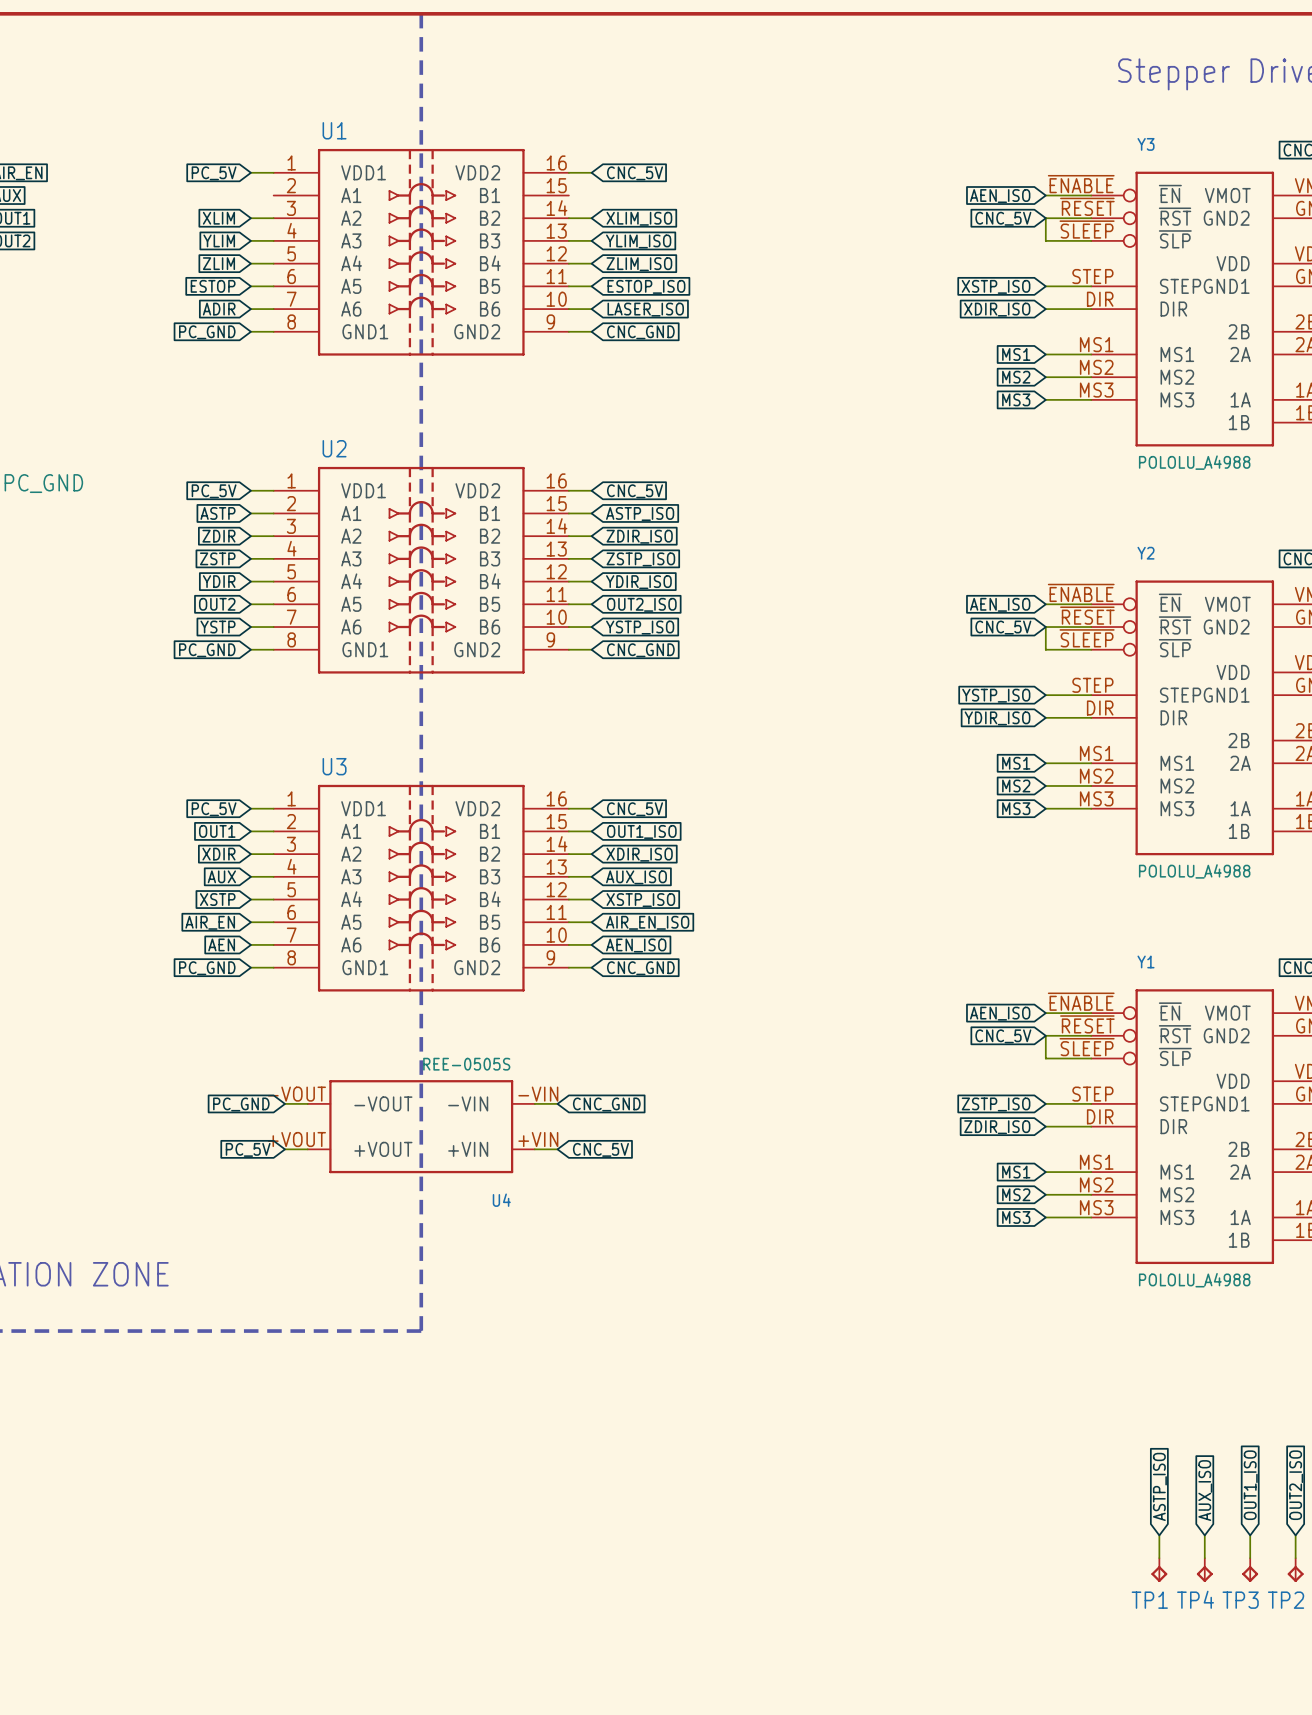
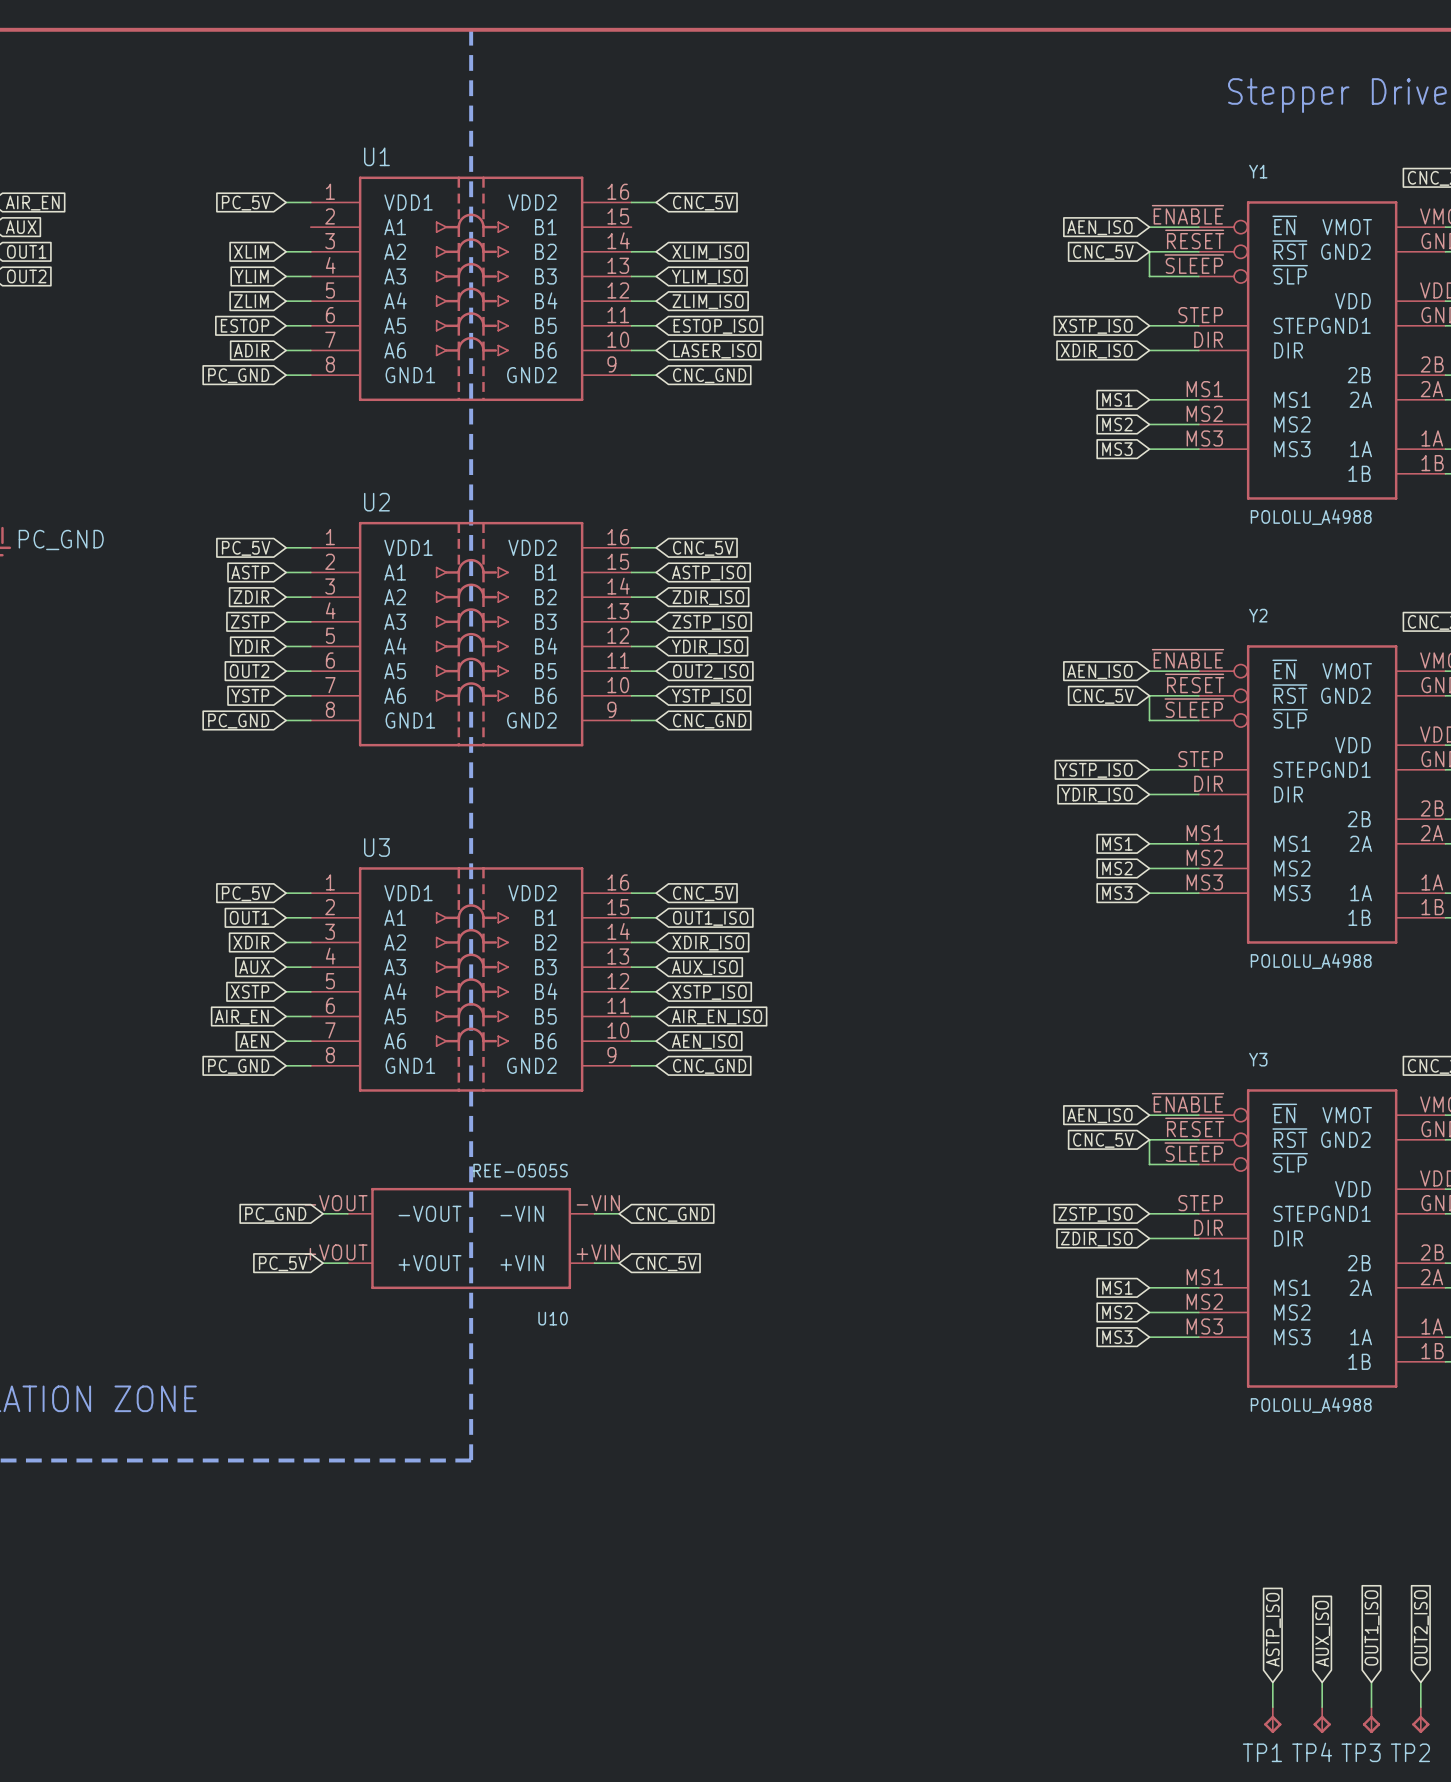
Y3 name: Y3 (1146, 144) -> Y1 (1258, 171)
Y1 name: Y1 (1146, 961) -> Y3 (1258, 1059)
U4 name: U4 (501, 1200) -> U10 (553, 1318)

